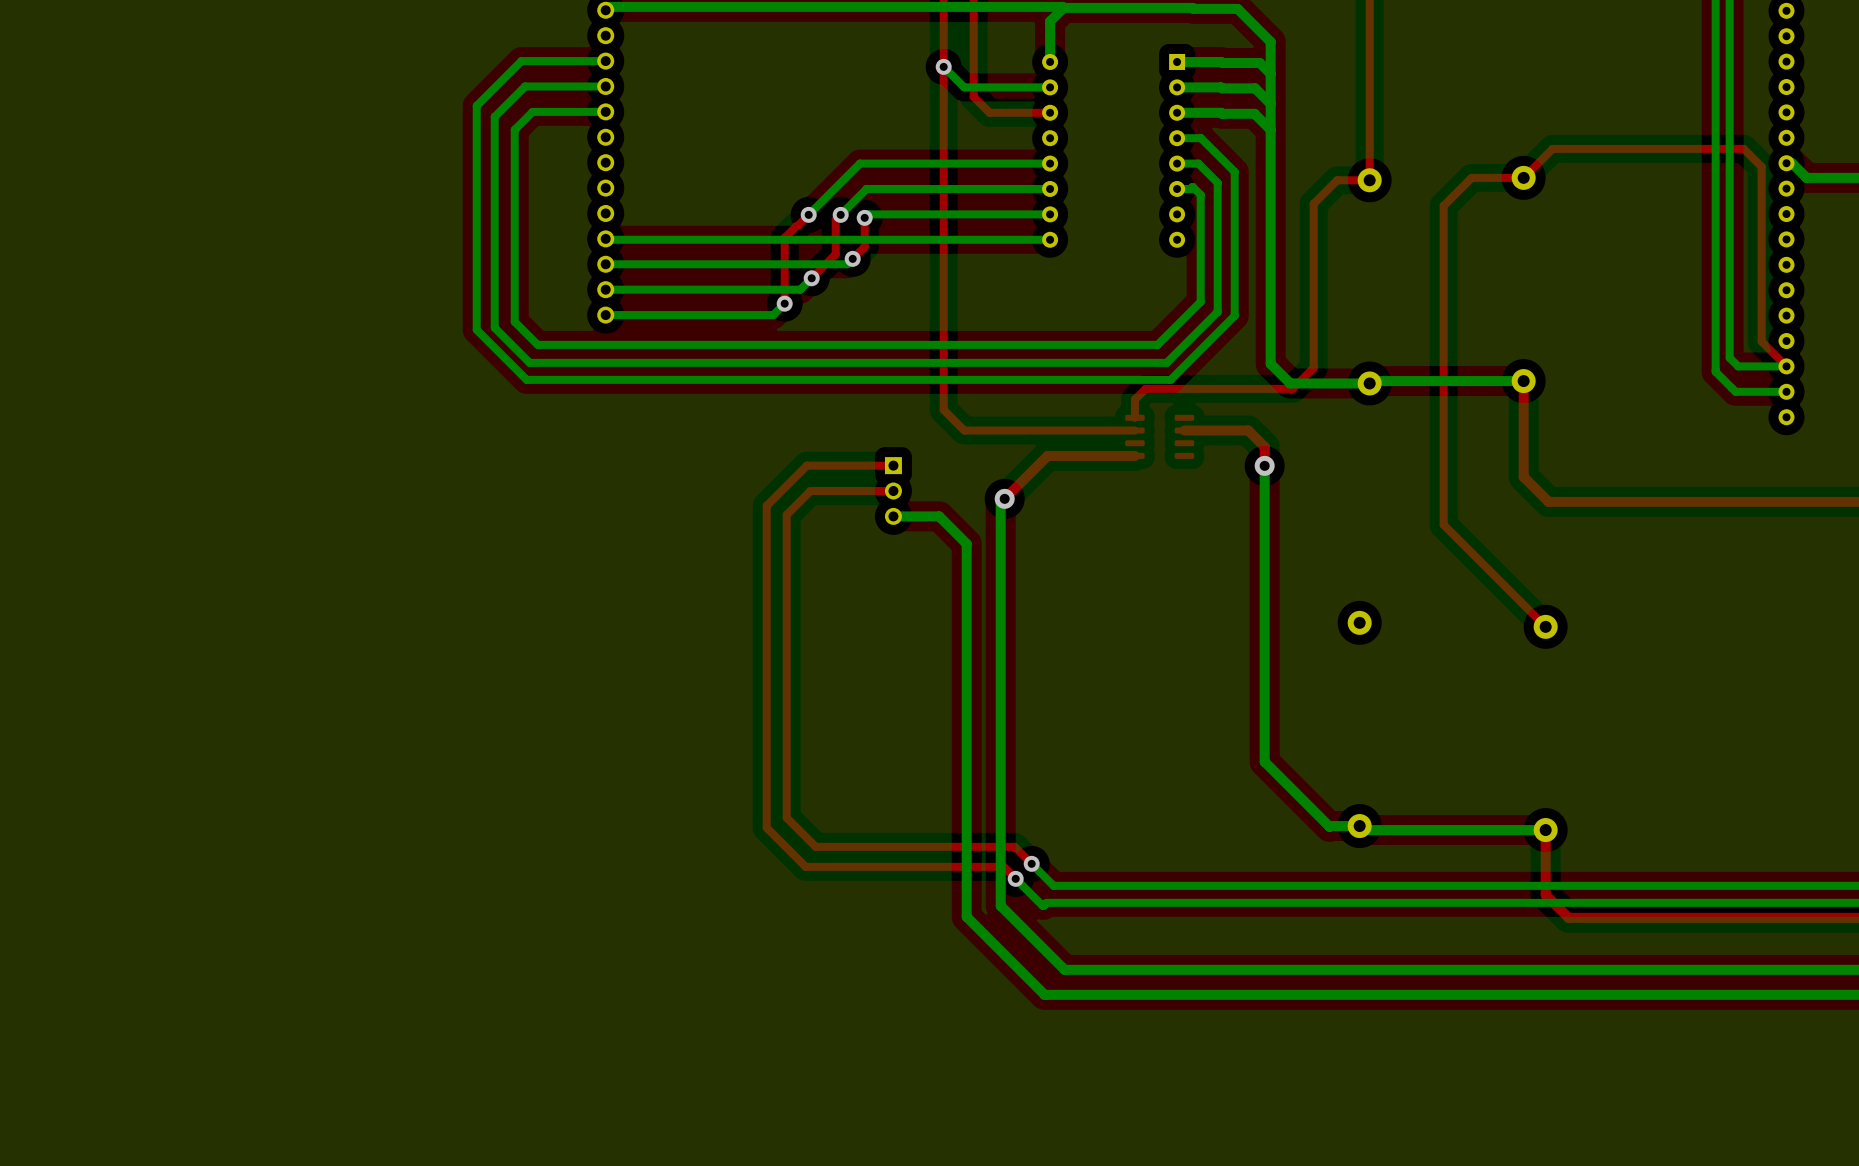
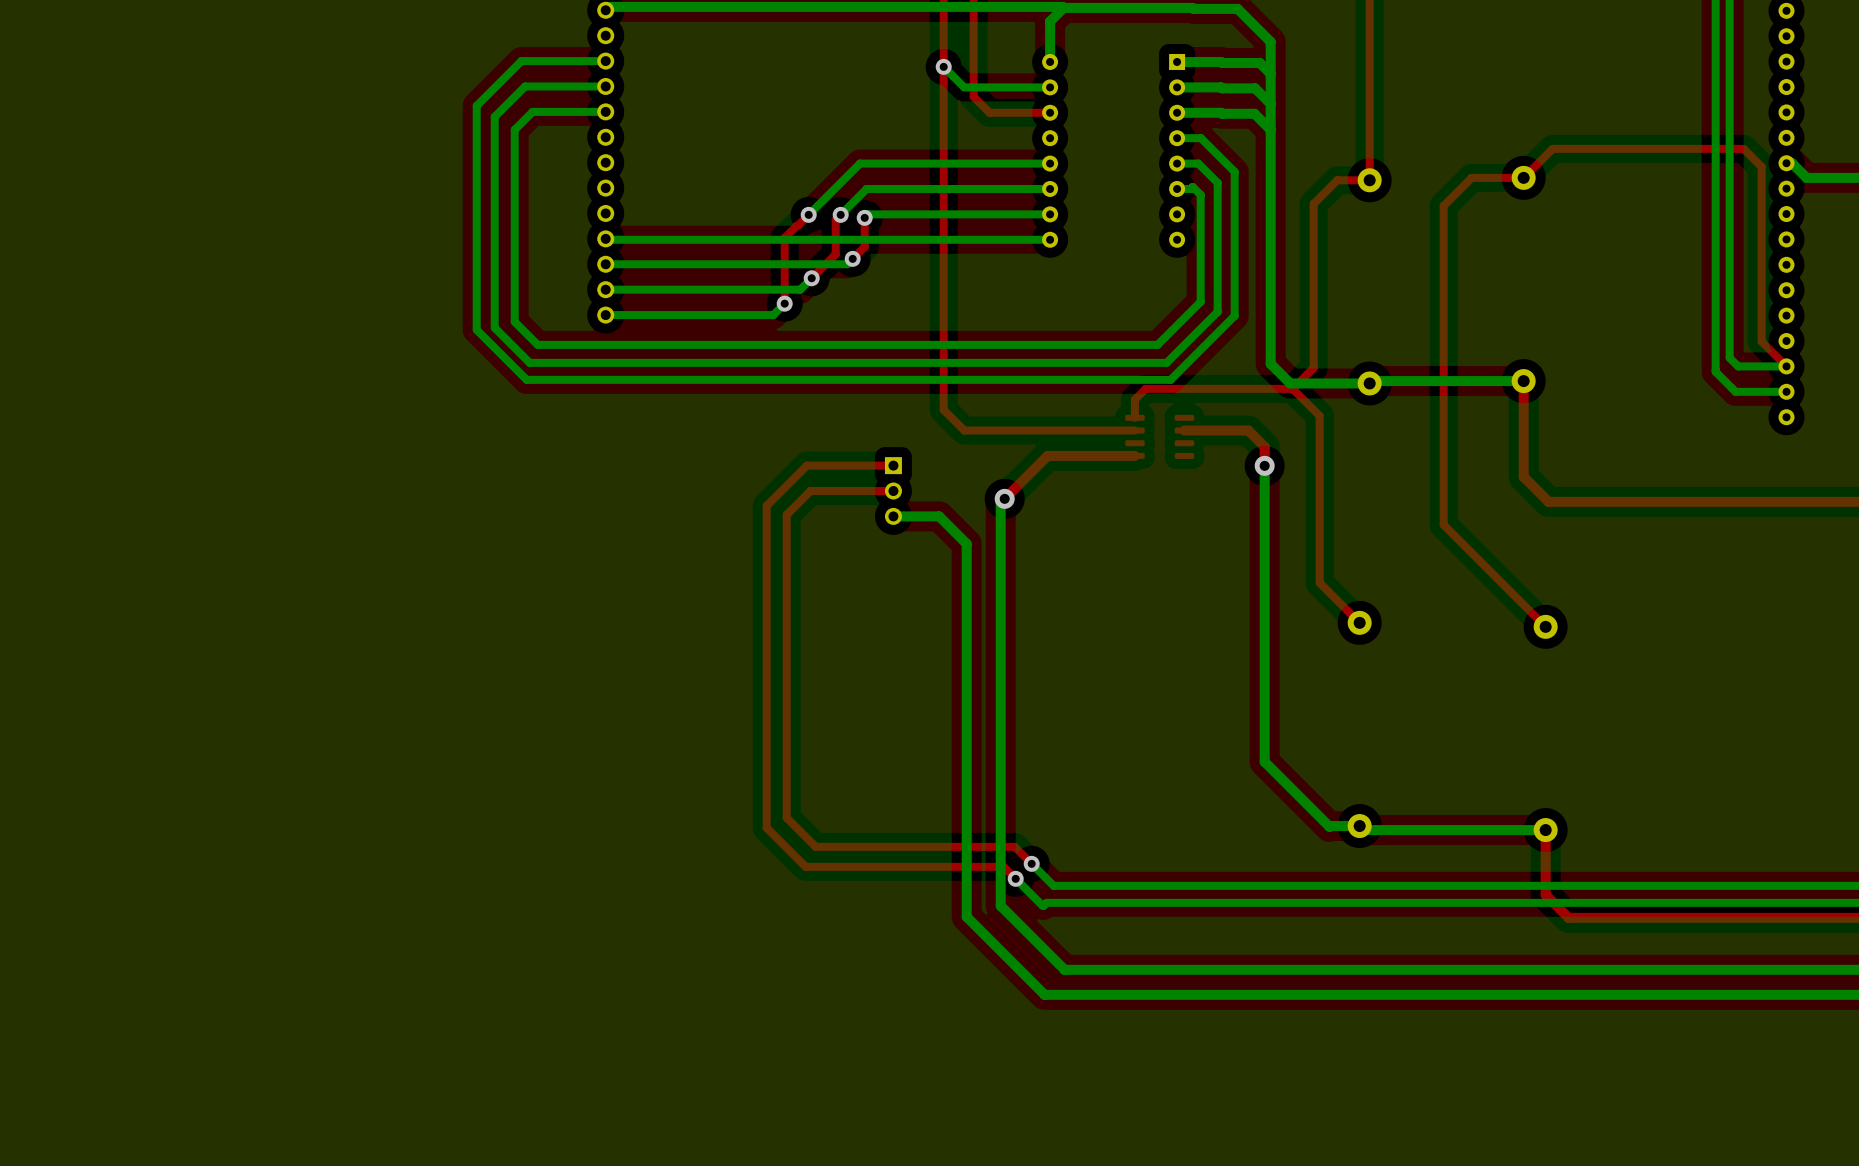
top track: none -> (1292, 388) (1319, 415) (1319, 582) (1359, 622)

